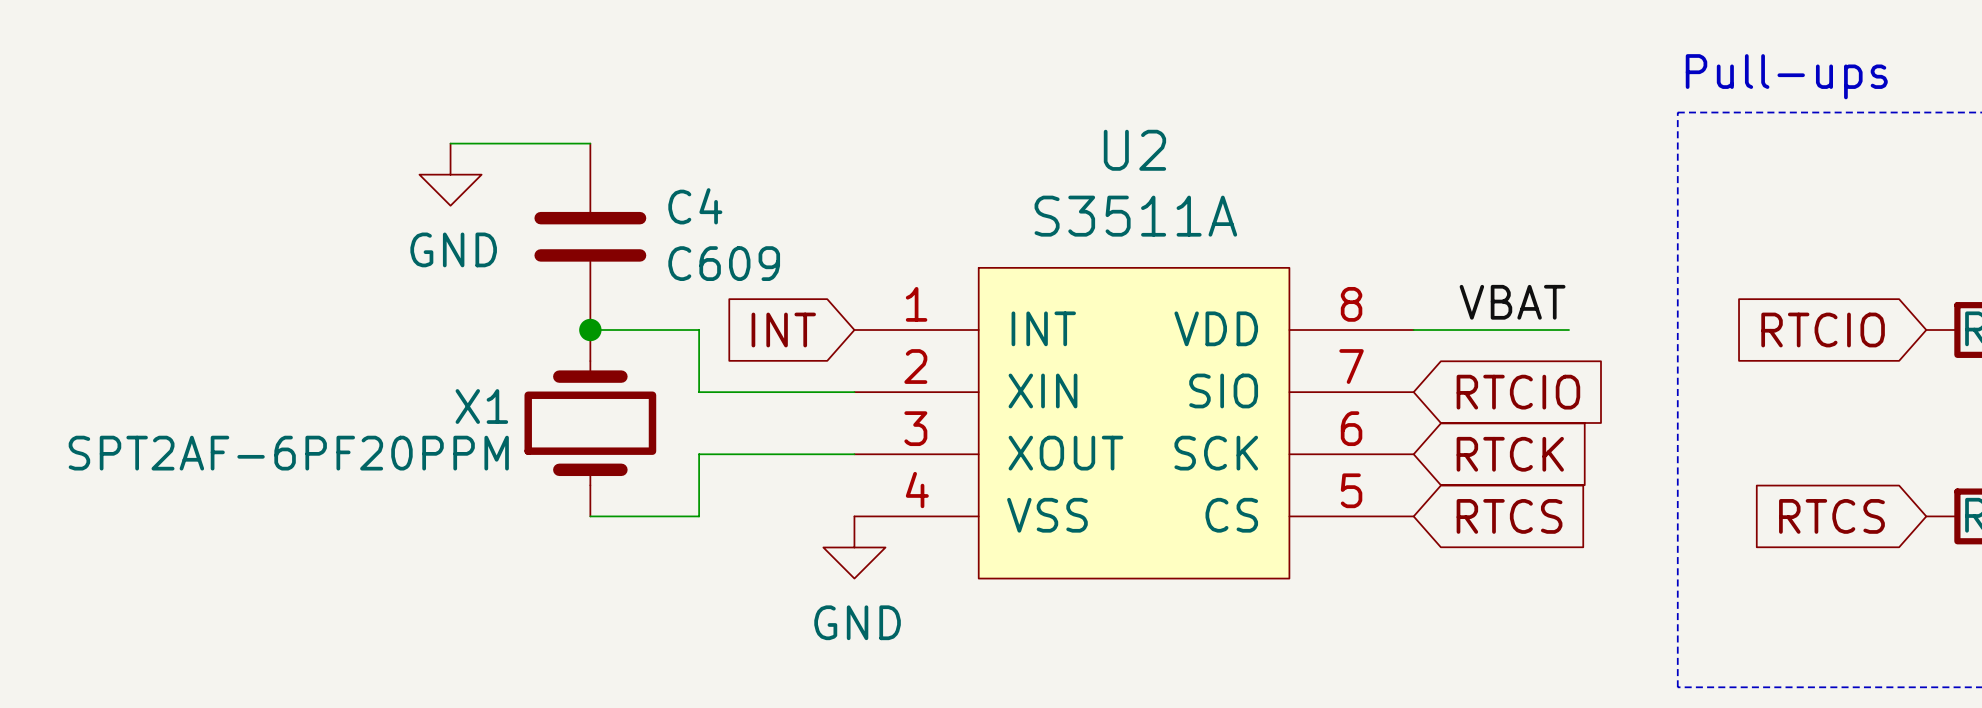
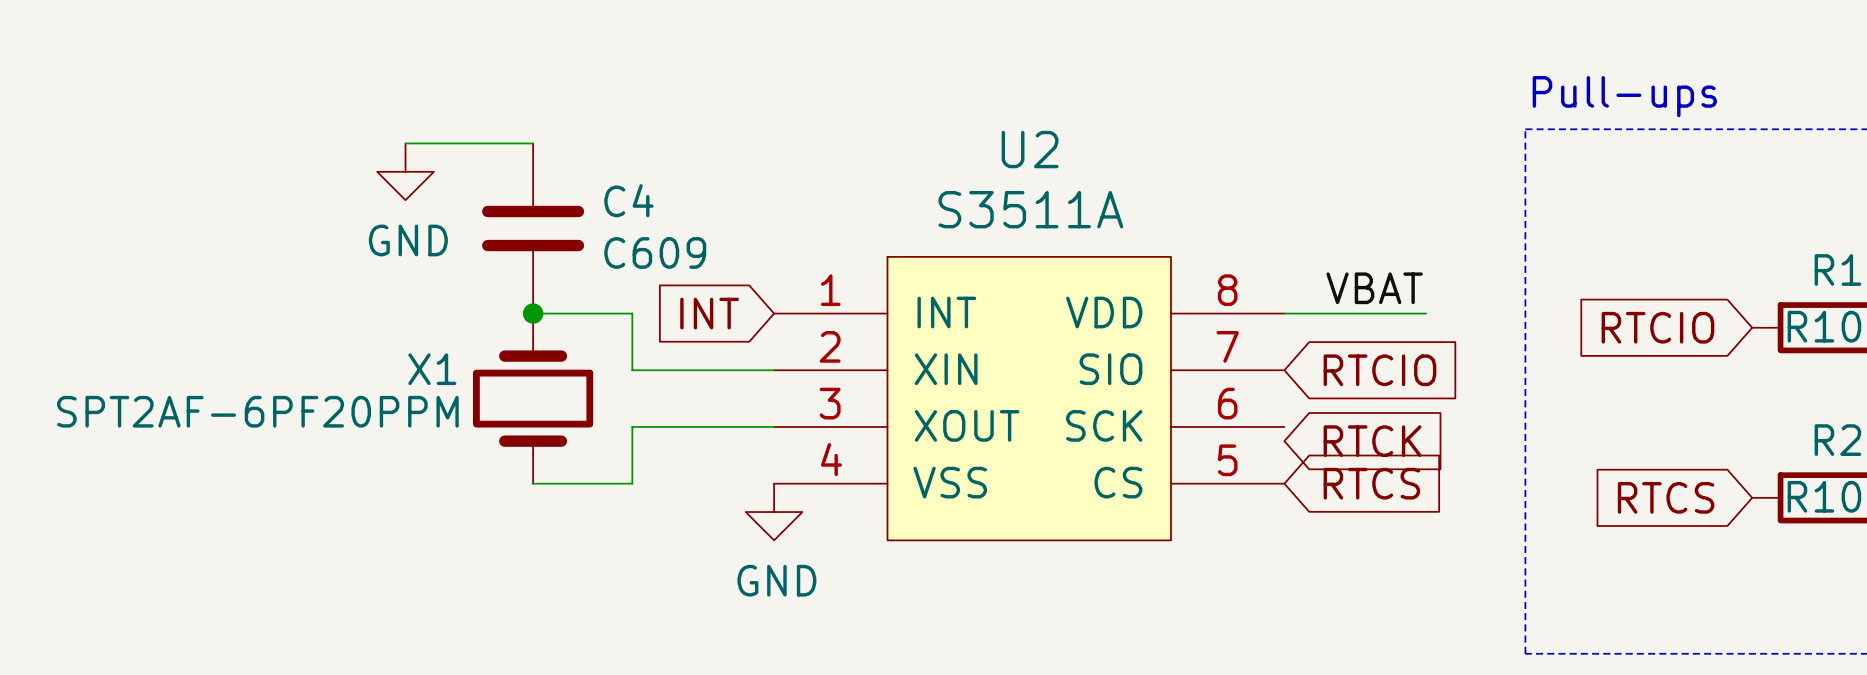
wire: (450, 143) (590, 143) -> (405, 143) (533, 143)
power symbol position: GND (450, 174) -> GND (405, 171)
C4 position: (590, 236) -> (533, 228)
label position: VBAT (1512, 302) -> VBAT (1374, 288)
wire: (590, 330) (699, 330) -> (533, 313) (632, 313) (632, 327)
junction position: (590, 330) -> (533, 313)
global label position: INT (783, 330) -> INT (709, 313)
wire: (1413, 330) (1569, 330) -> (1284, 313) (1426, 313)
wire: (699, 376) (699, 392) (854, 392) -> (632, 370) (774, 370)
global label position: RTCIO (1518, 392) -> RTCIO (1379, 370)
X1 name position: X1 (481, 406) -> X1 (432, 369)
X1 position: (590, 423) -> (533, 398)
U2 position: (1134, 423) -> (1029, 398)
X1 value position: SPT2AF-6PF20PPM (288, 453) -> SPT2AF-6PF20PPM (257, 411)
wire: (699, 454) (854, 454) -> (632, 441) (632, 426) (774, 426)
wire: (699, 500) (699, 516) (590, 516) -> (632, 483) (533, 483)
global label position: RTCS (1509, 516) -> RTCS (1371, 483)
power symbol position: GND (854, 547) -> GND (774, 512)

